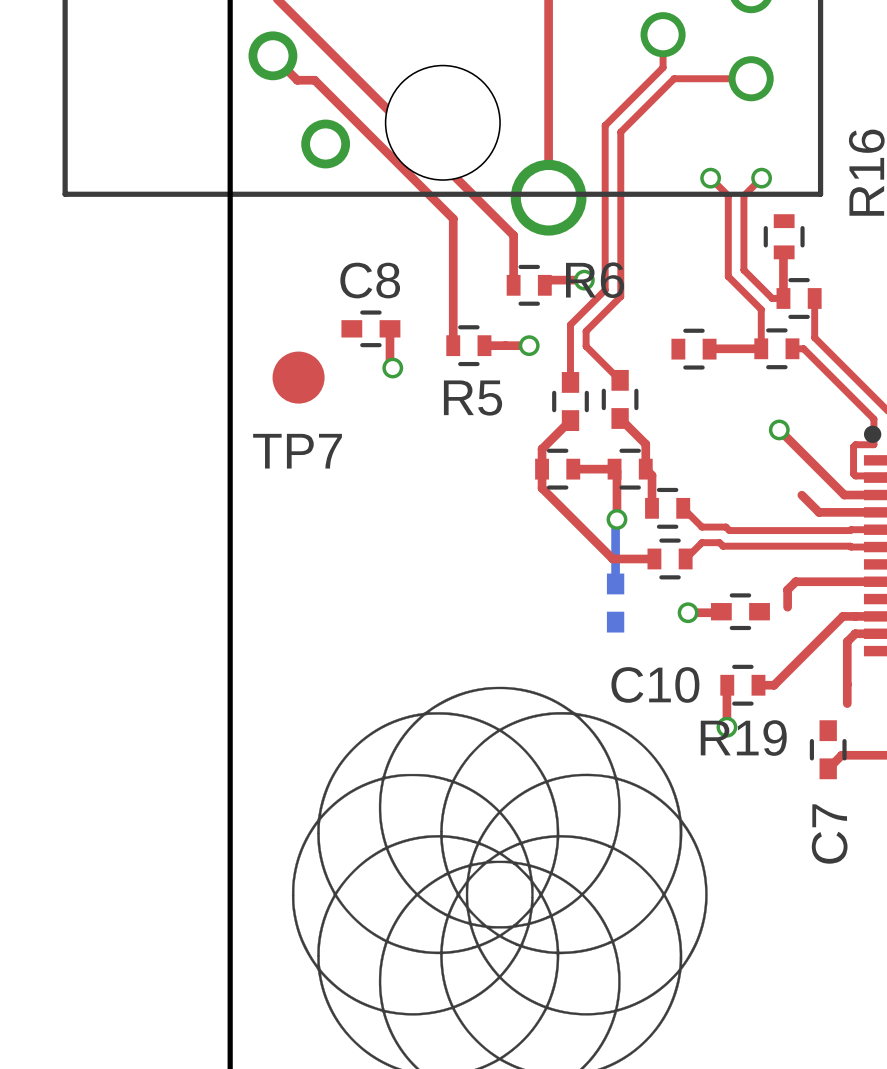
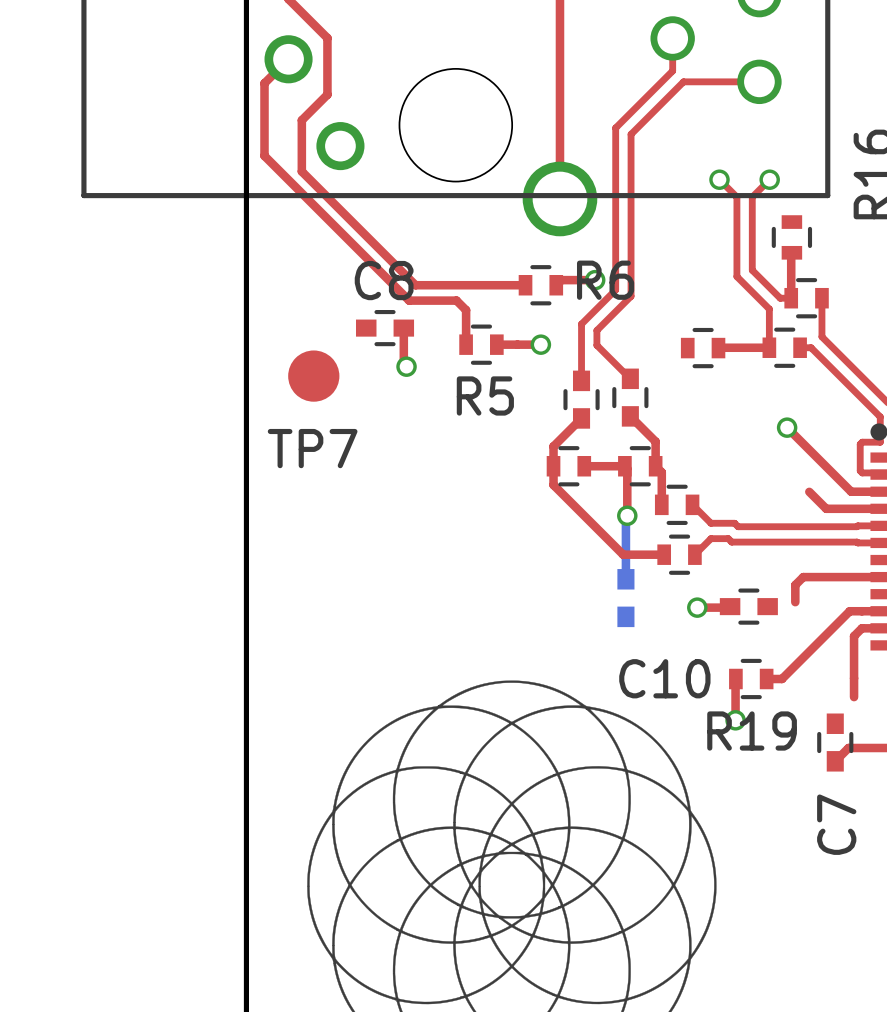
top track: (312, 34) (513, 235) (513, 285) -> (327, 38) (327, 94) (301, 120) (301, 171) (415, 285) (525, 285)
top track: (272, 55) (297, 80) (314, 80) (453, 218) (453, 310) -> (288, 59) (264, 83) (264, 155) (409, 300) (456, 300) (466, 310)

